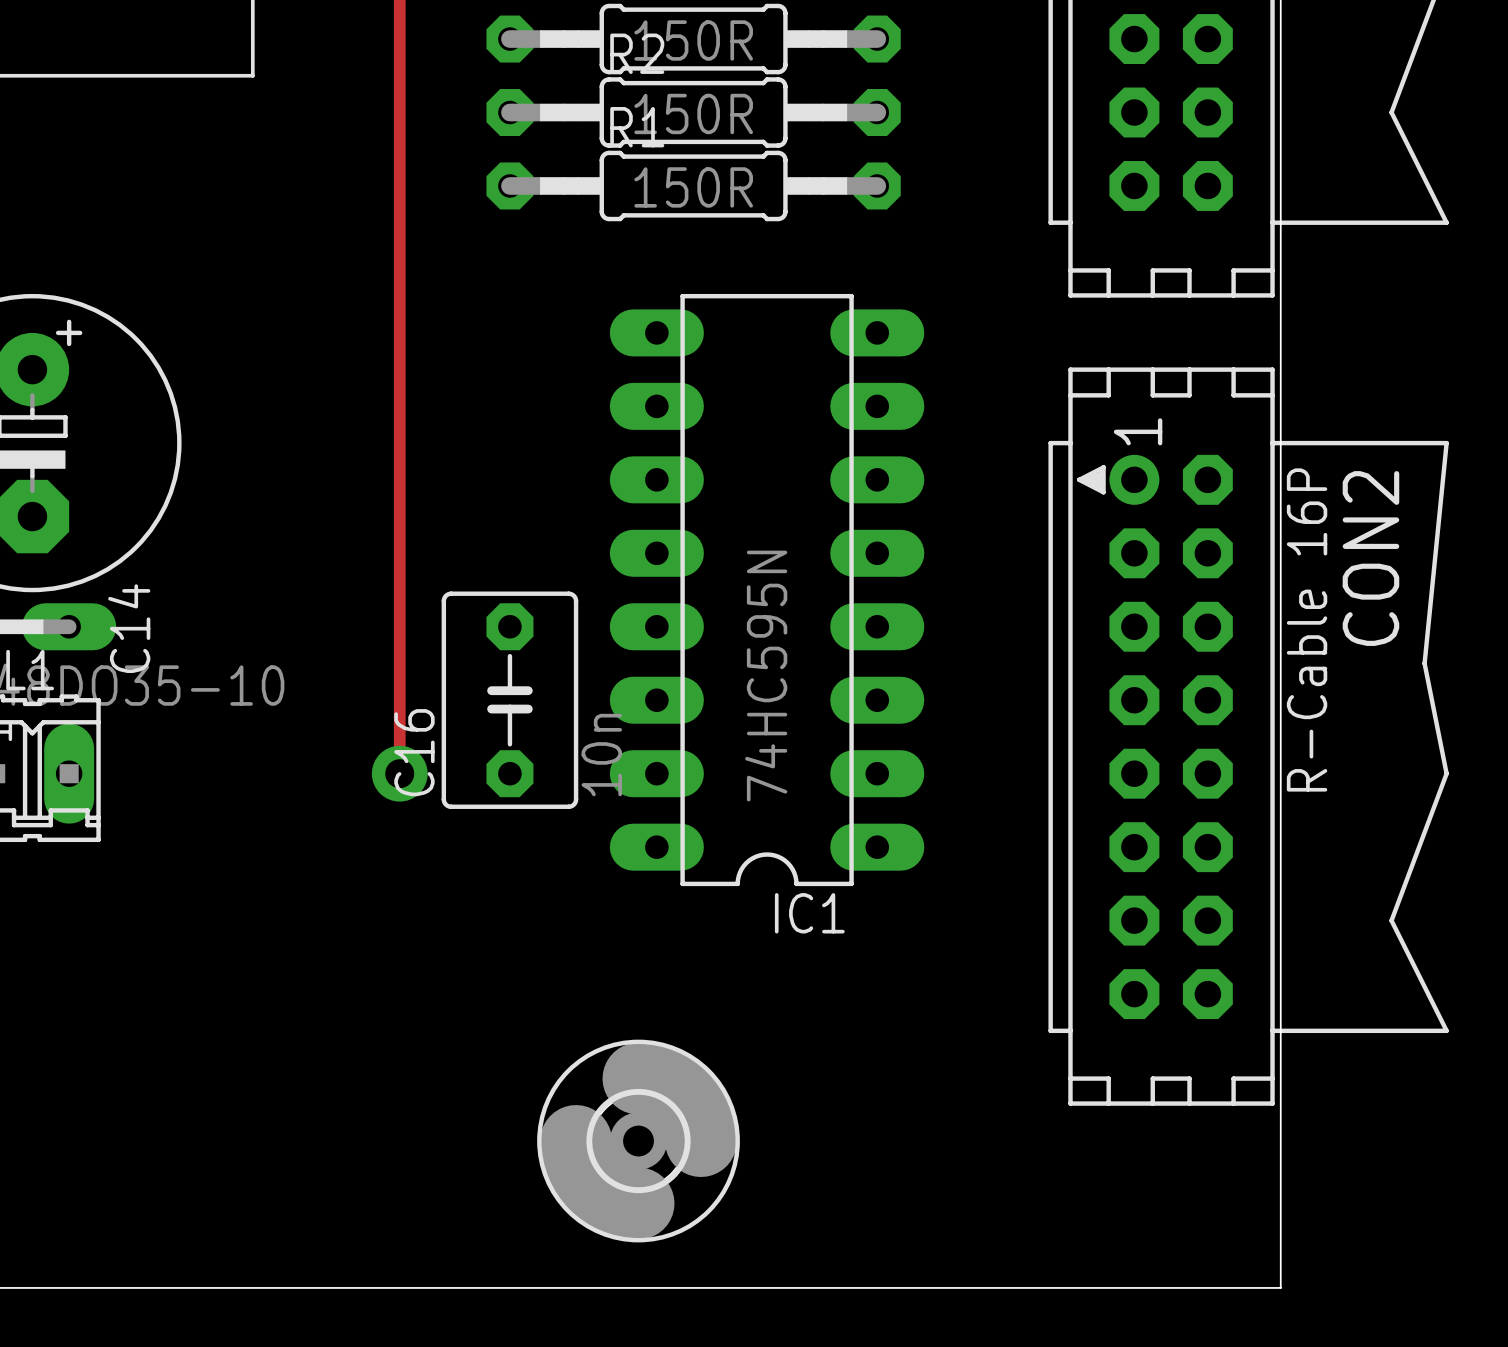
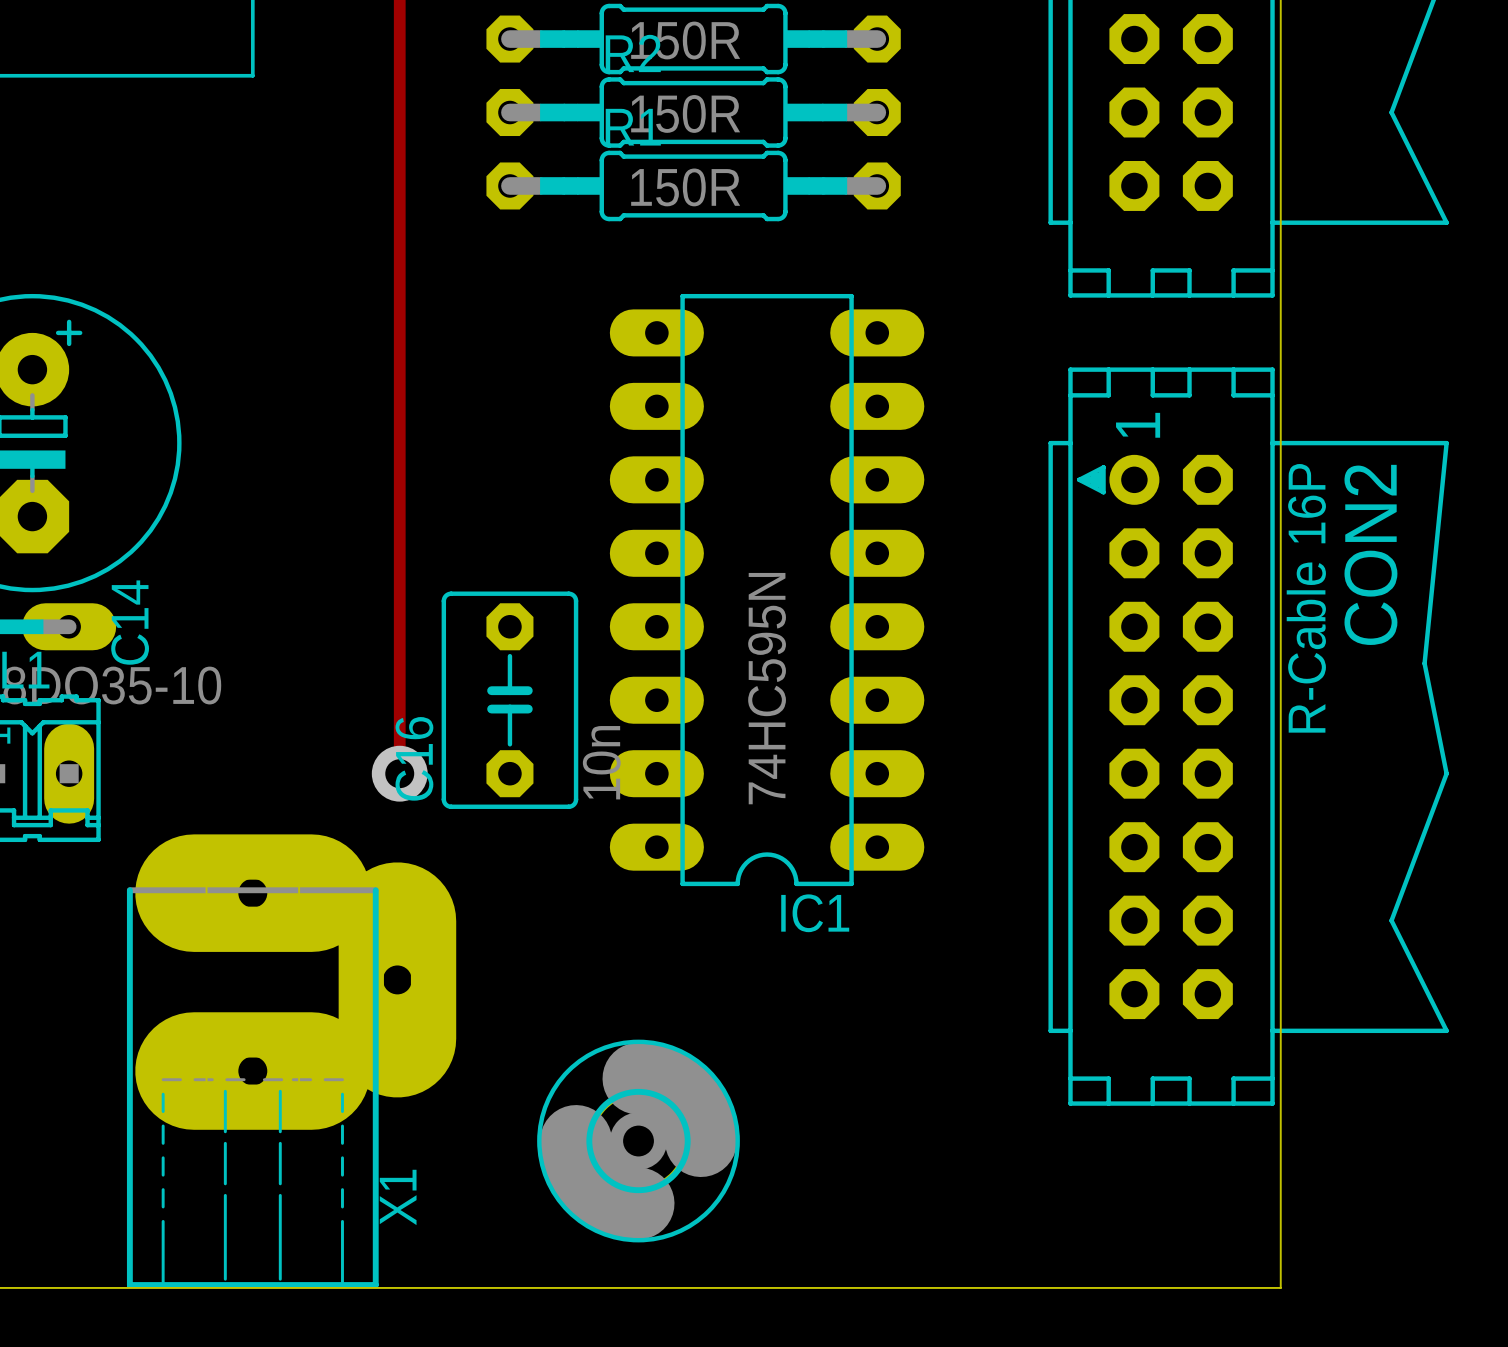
X1: none -> (291, 1061)

